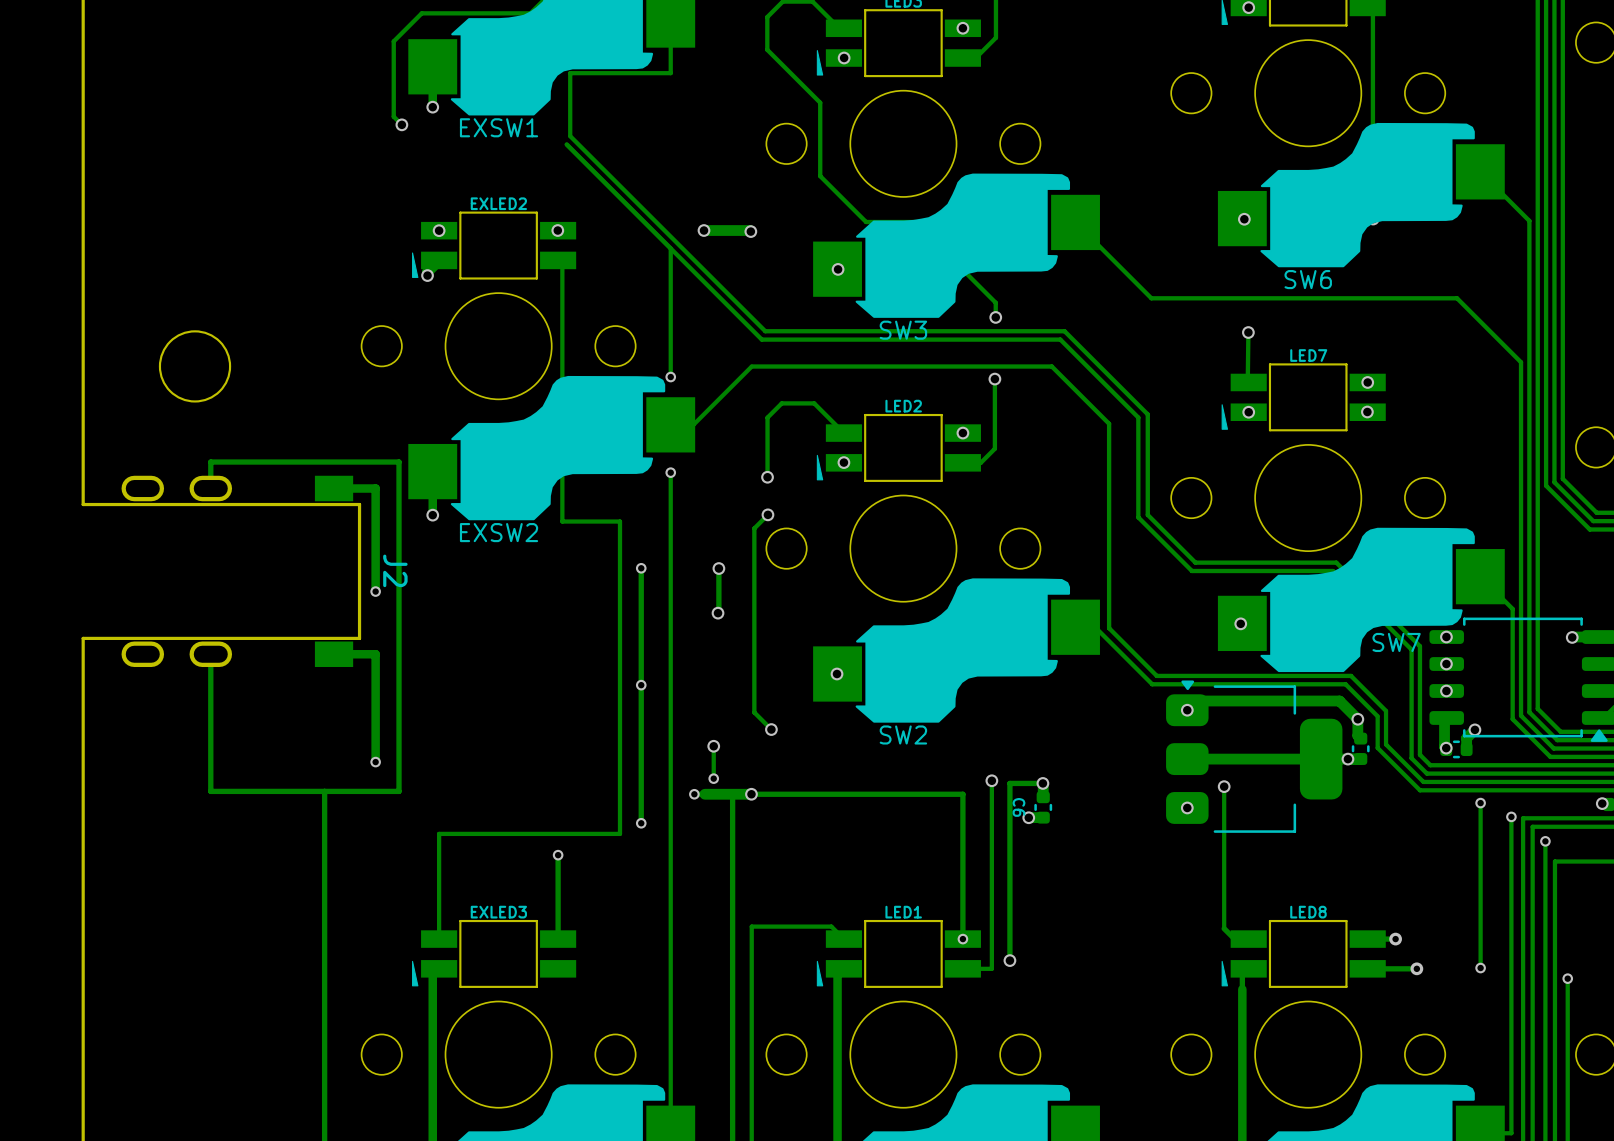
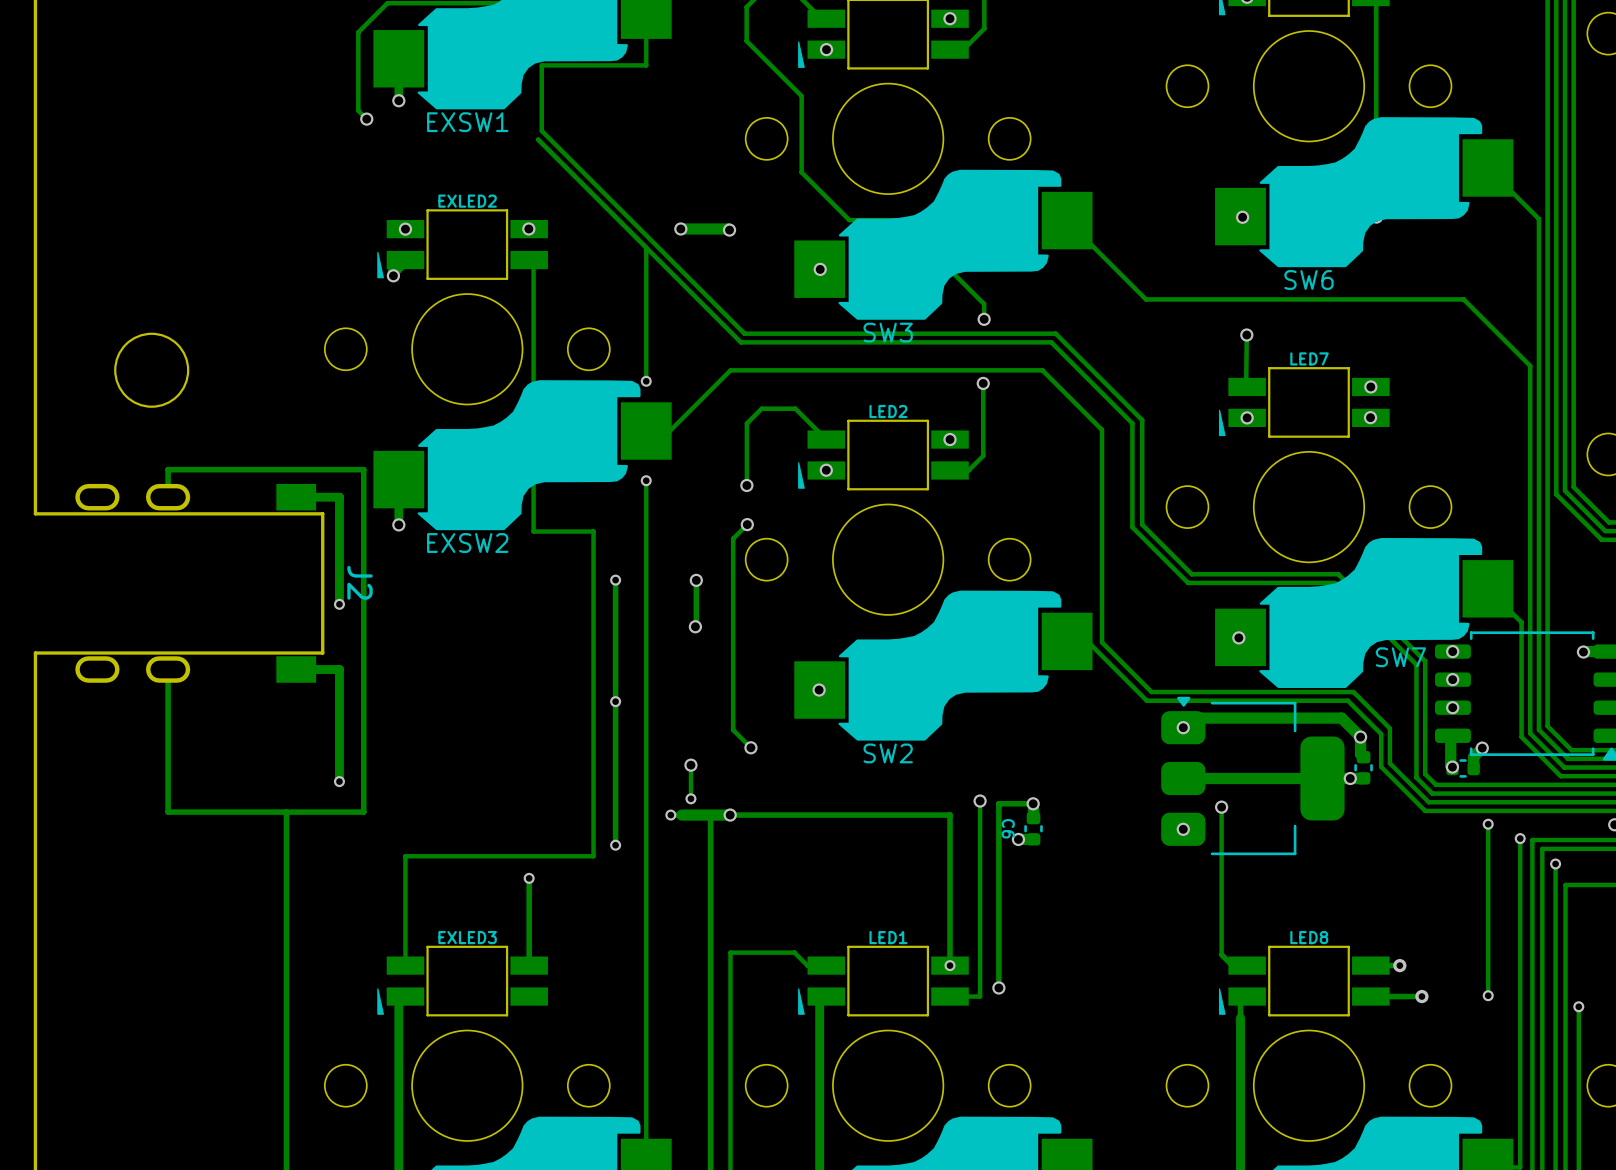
track: (813, 926) (831, 926) (843, 939) -> (794, 952) (807, 965) (826, 965)

